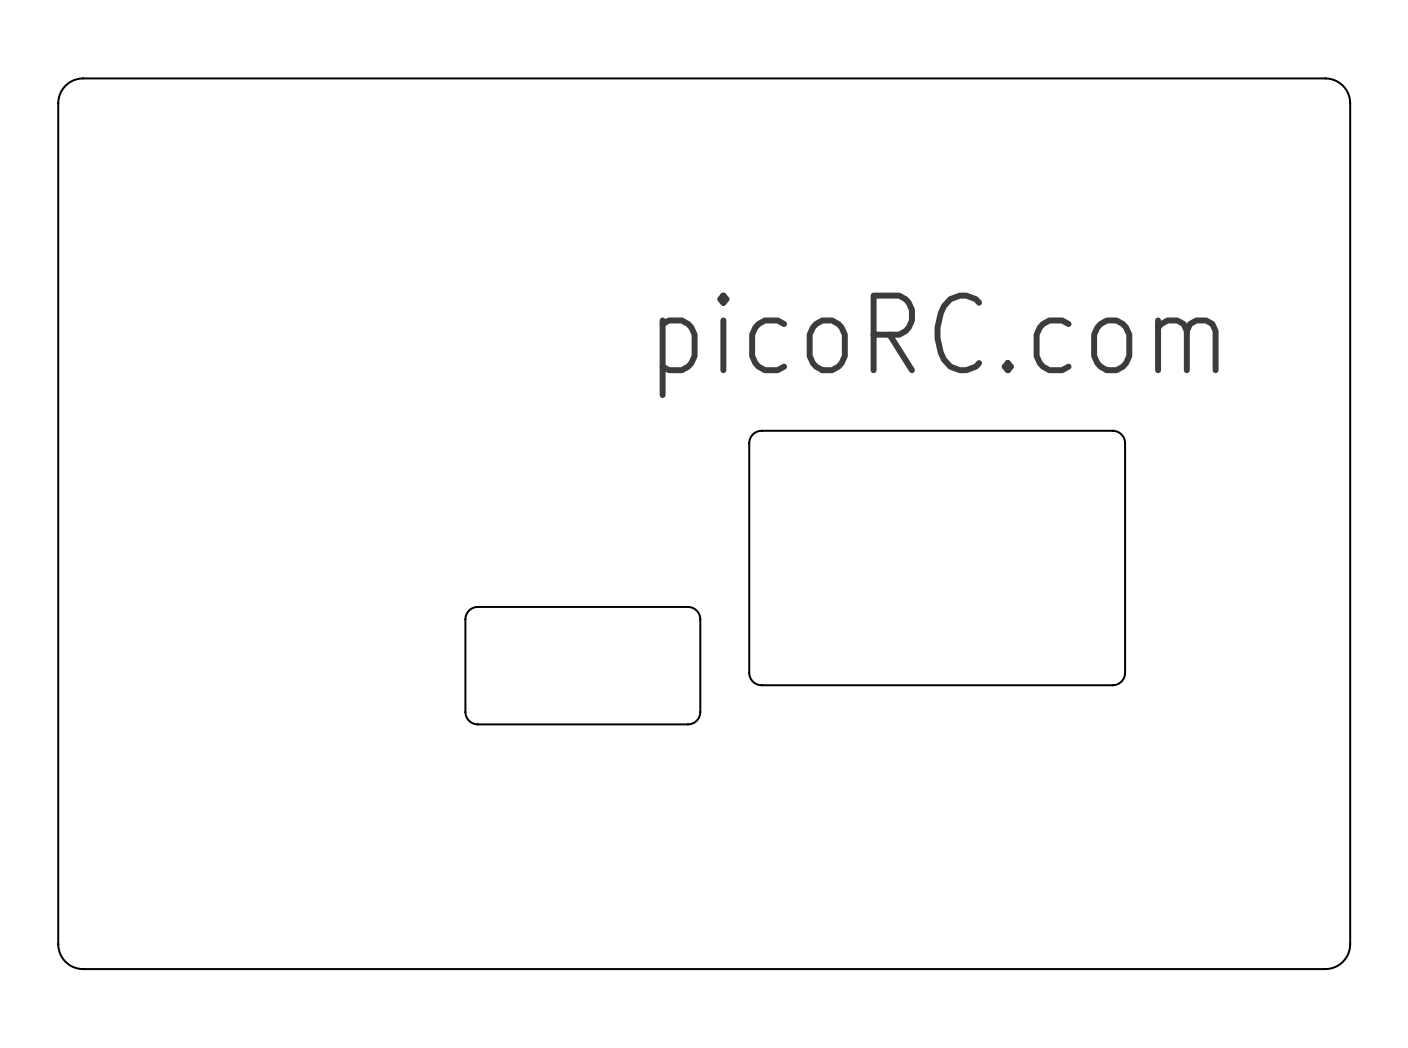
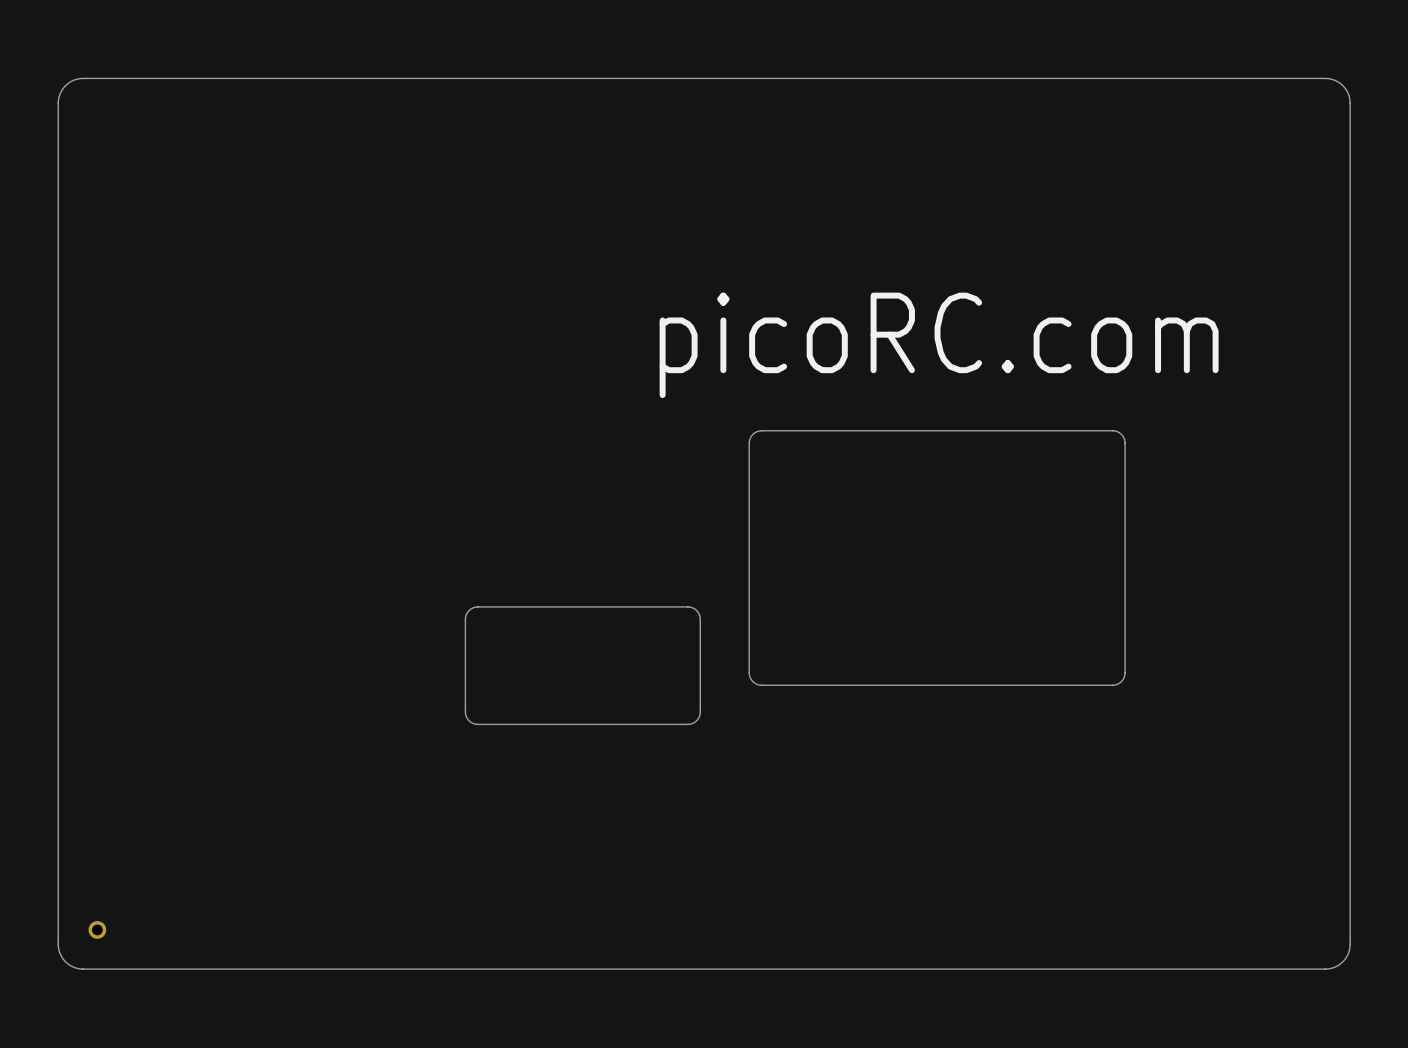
via: none -> (97, 929)

